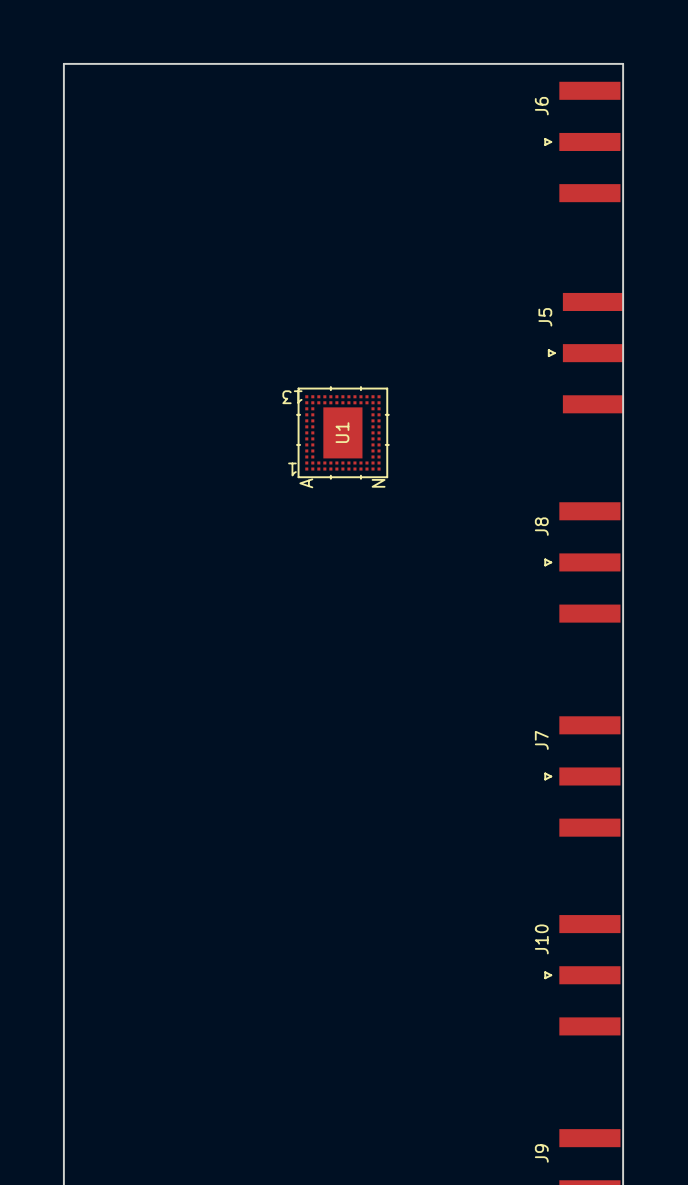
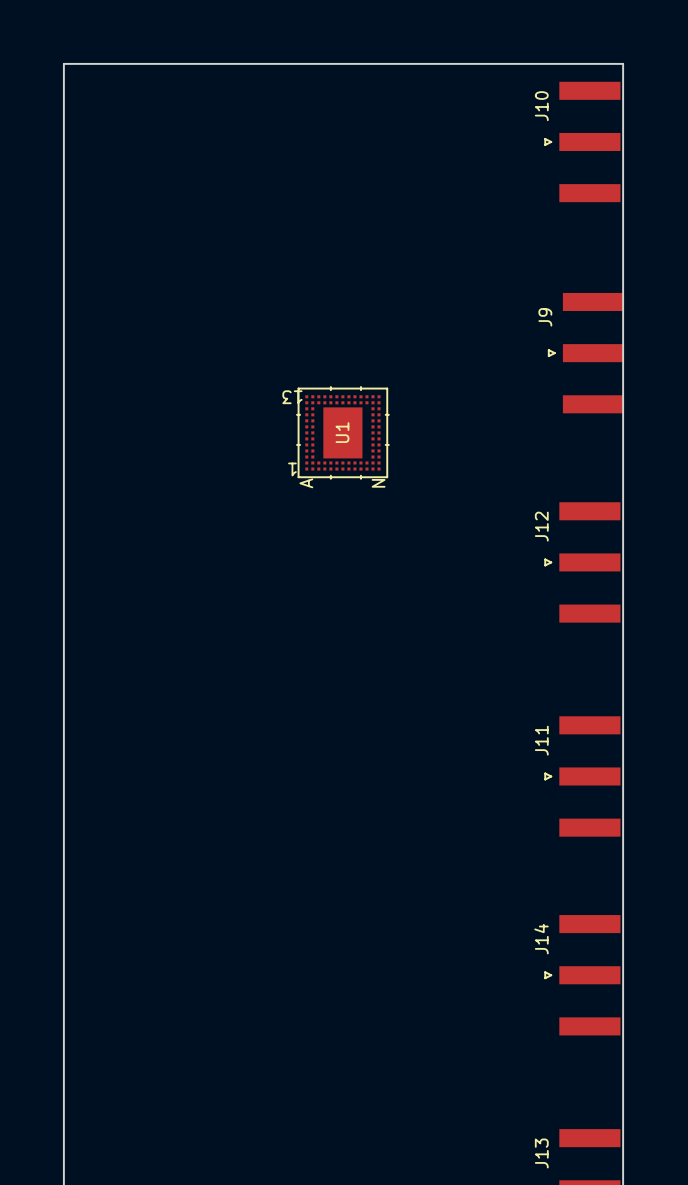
J6 name: J6 (541, 106) -> J10 (541, 106)
J5 name: J5 (545, 317) -> J9 (545, 317)
J8 name: J8 (541, 526) -> J12 (541, 526)
J7 name: J7 (541, 740) -> J11 (541, 740)
J10 name: J10 (541, 939) -> J14 (541, 939)
J9 name: J9 (541, 1153) -> J13 (541, 1153)

